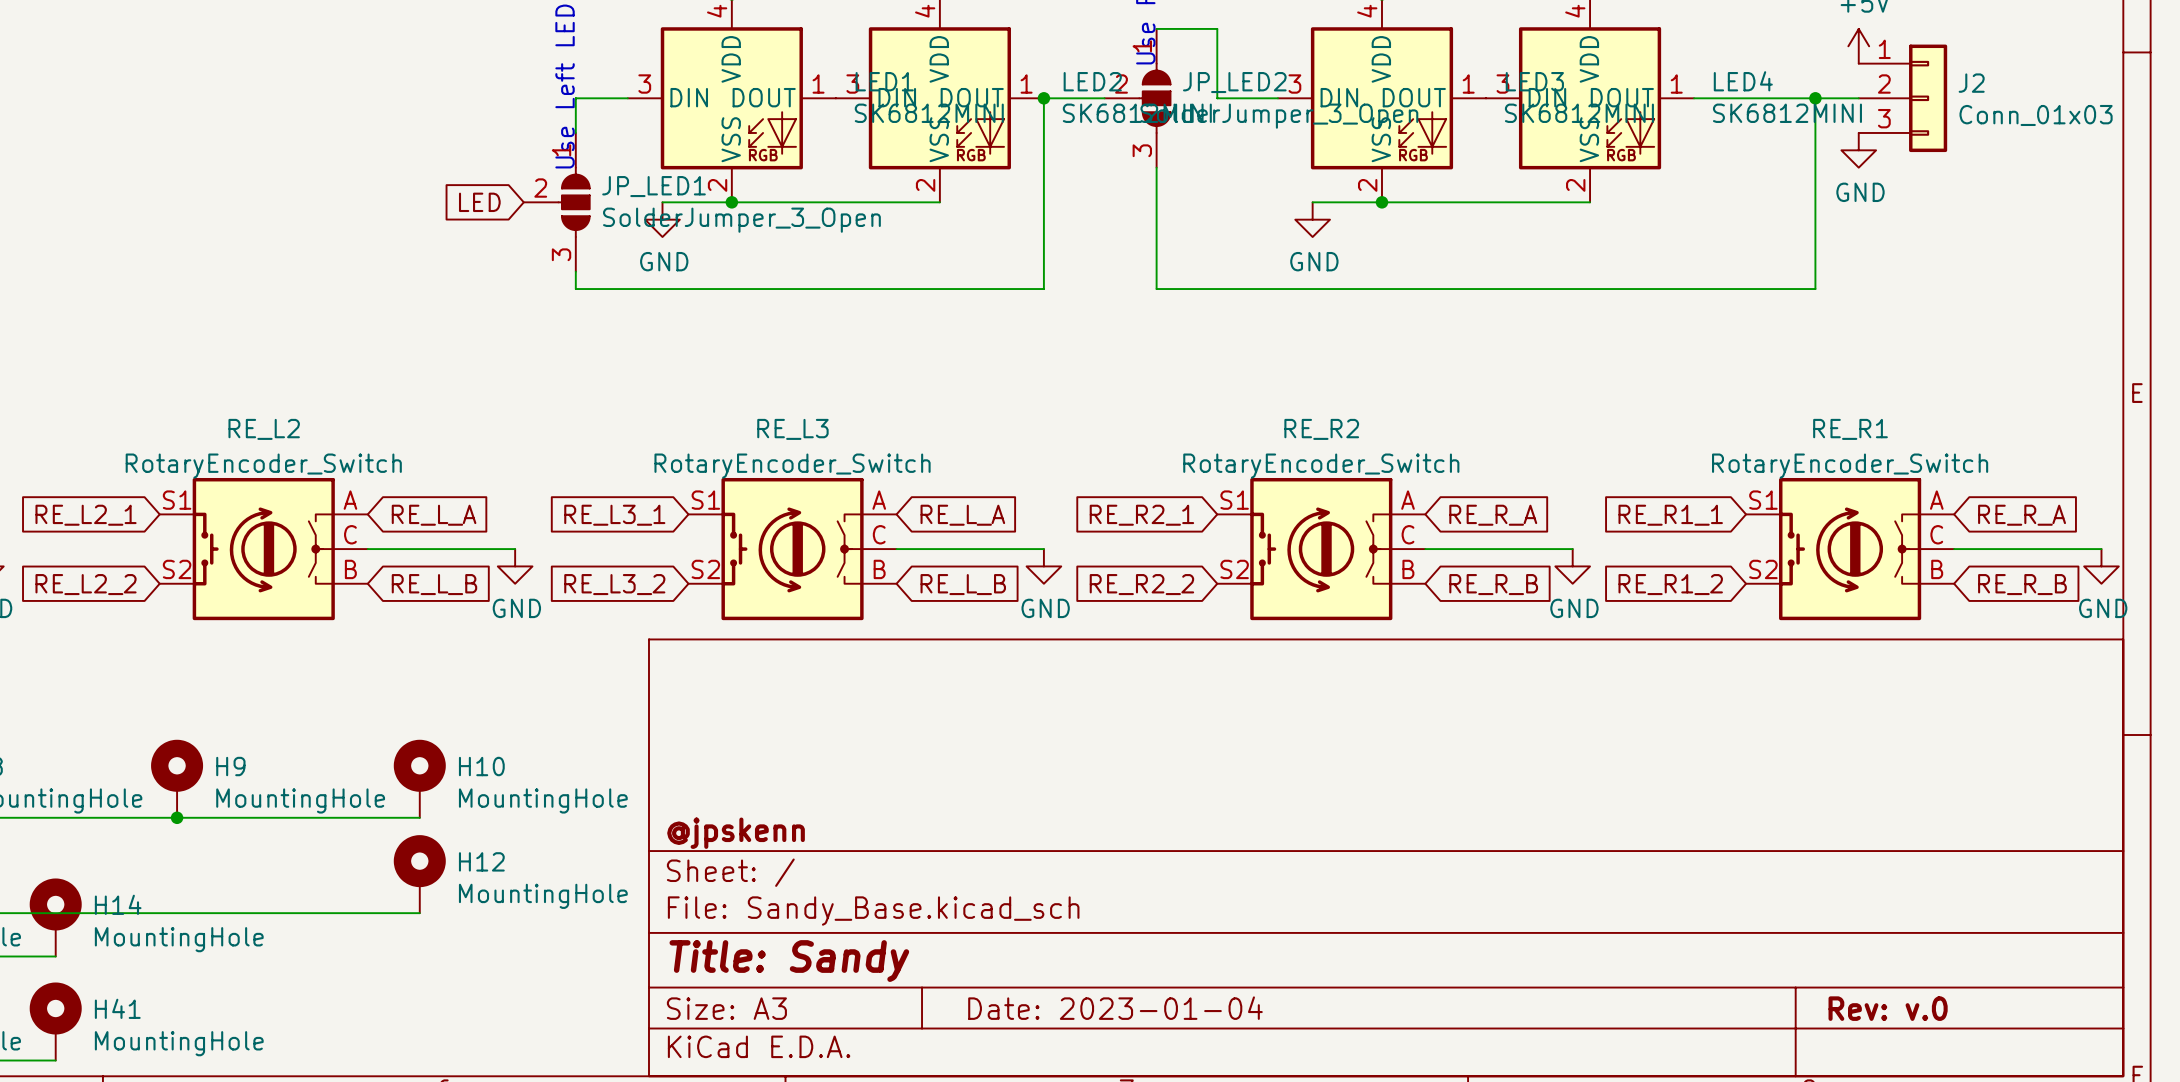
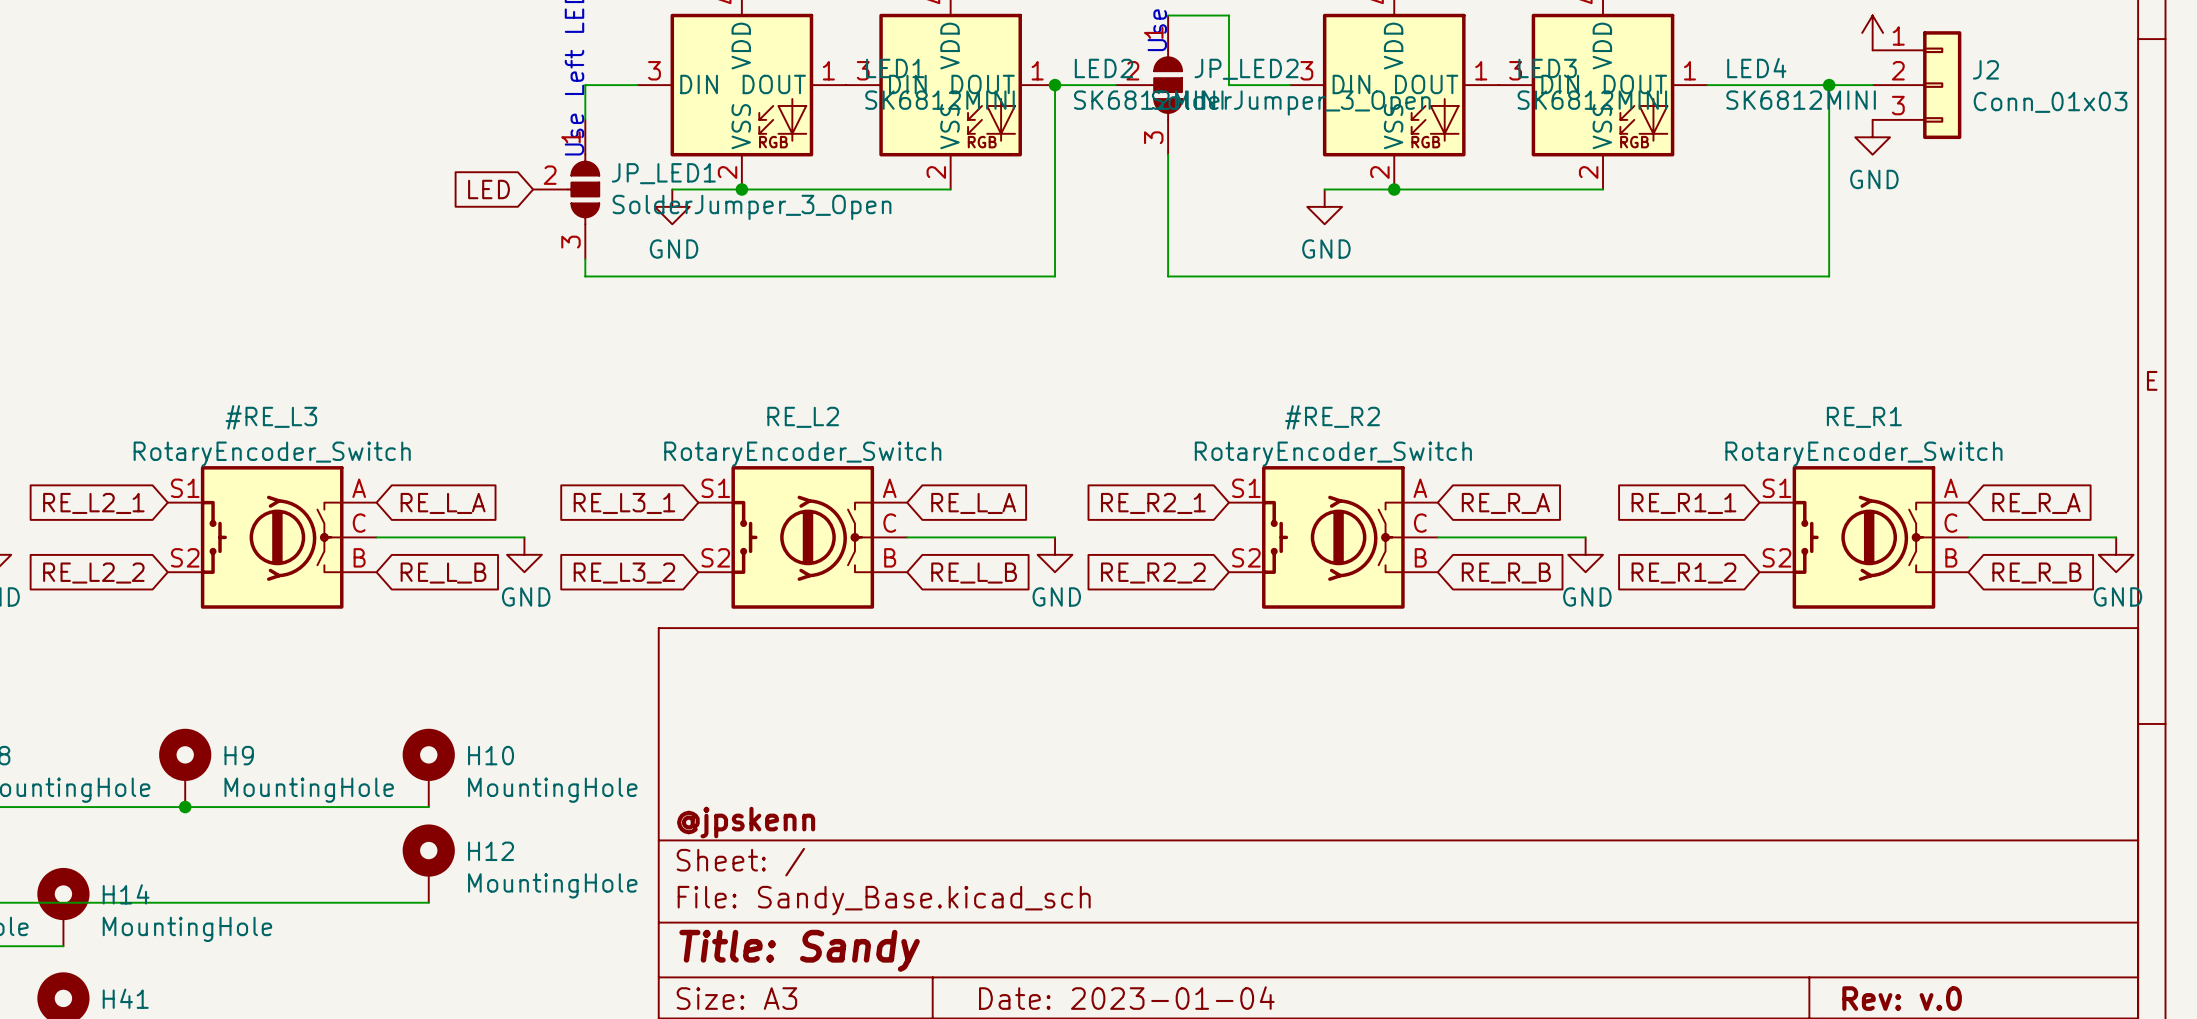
RE_L2 symbol: [159, 477, 368, 621] -> [698, 466, 908, 609]
RE_R1 symbol: [1746, 477, 1955, 621] -> [1759, 466, 1969, 609]
#RE_L3: none -> RotaryEncoder_Switch (272, 537)
RE_L3: RotaryEncoder_Switch (792, 549) -> none
RE_R2: RotaryEncoder_Switch (1321, 549) -> none
#RE_R2: none -> RotaryEncoder_Switch (1333, 537)

